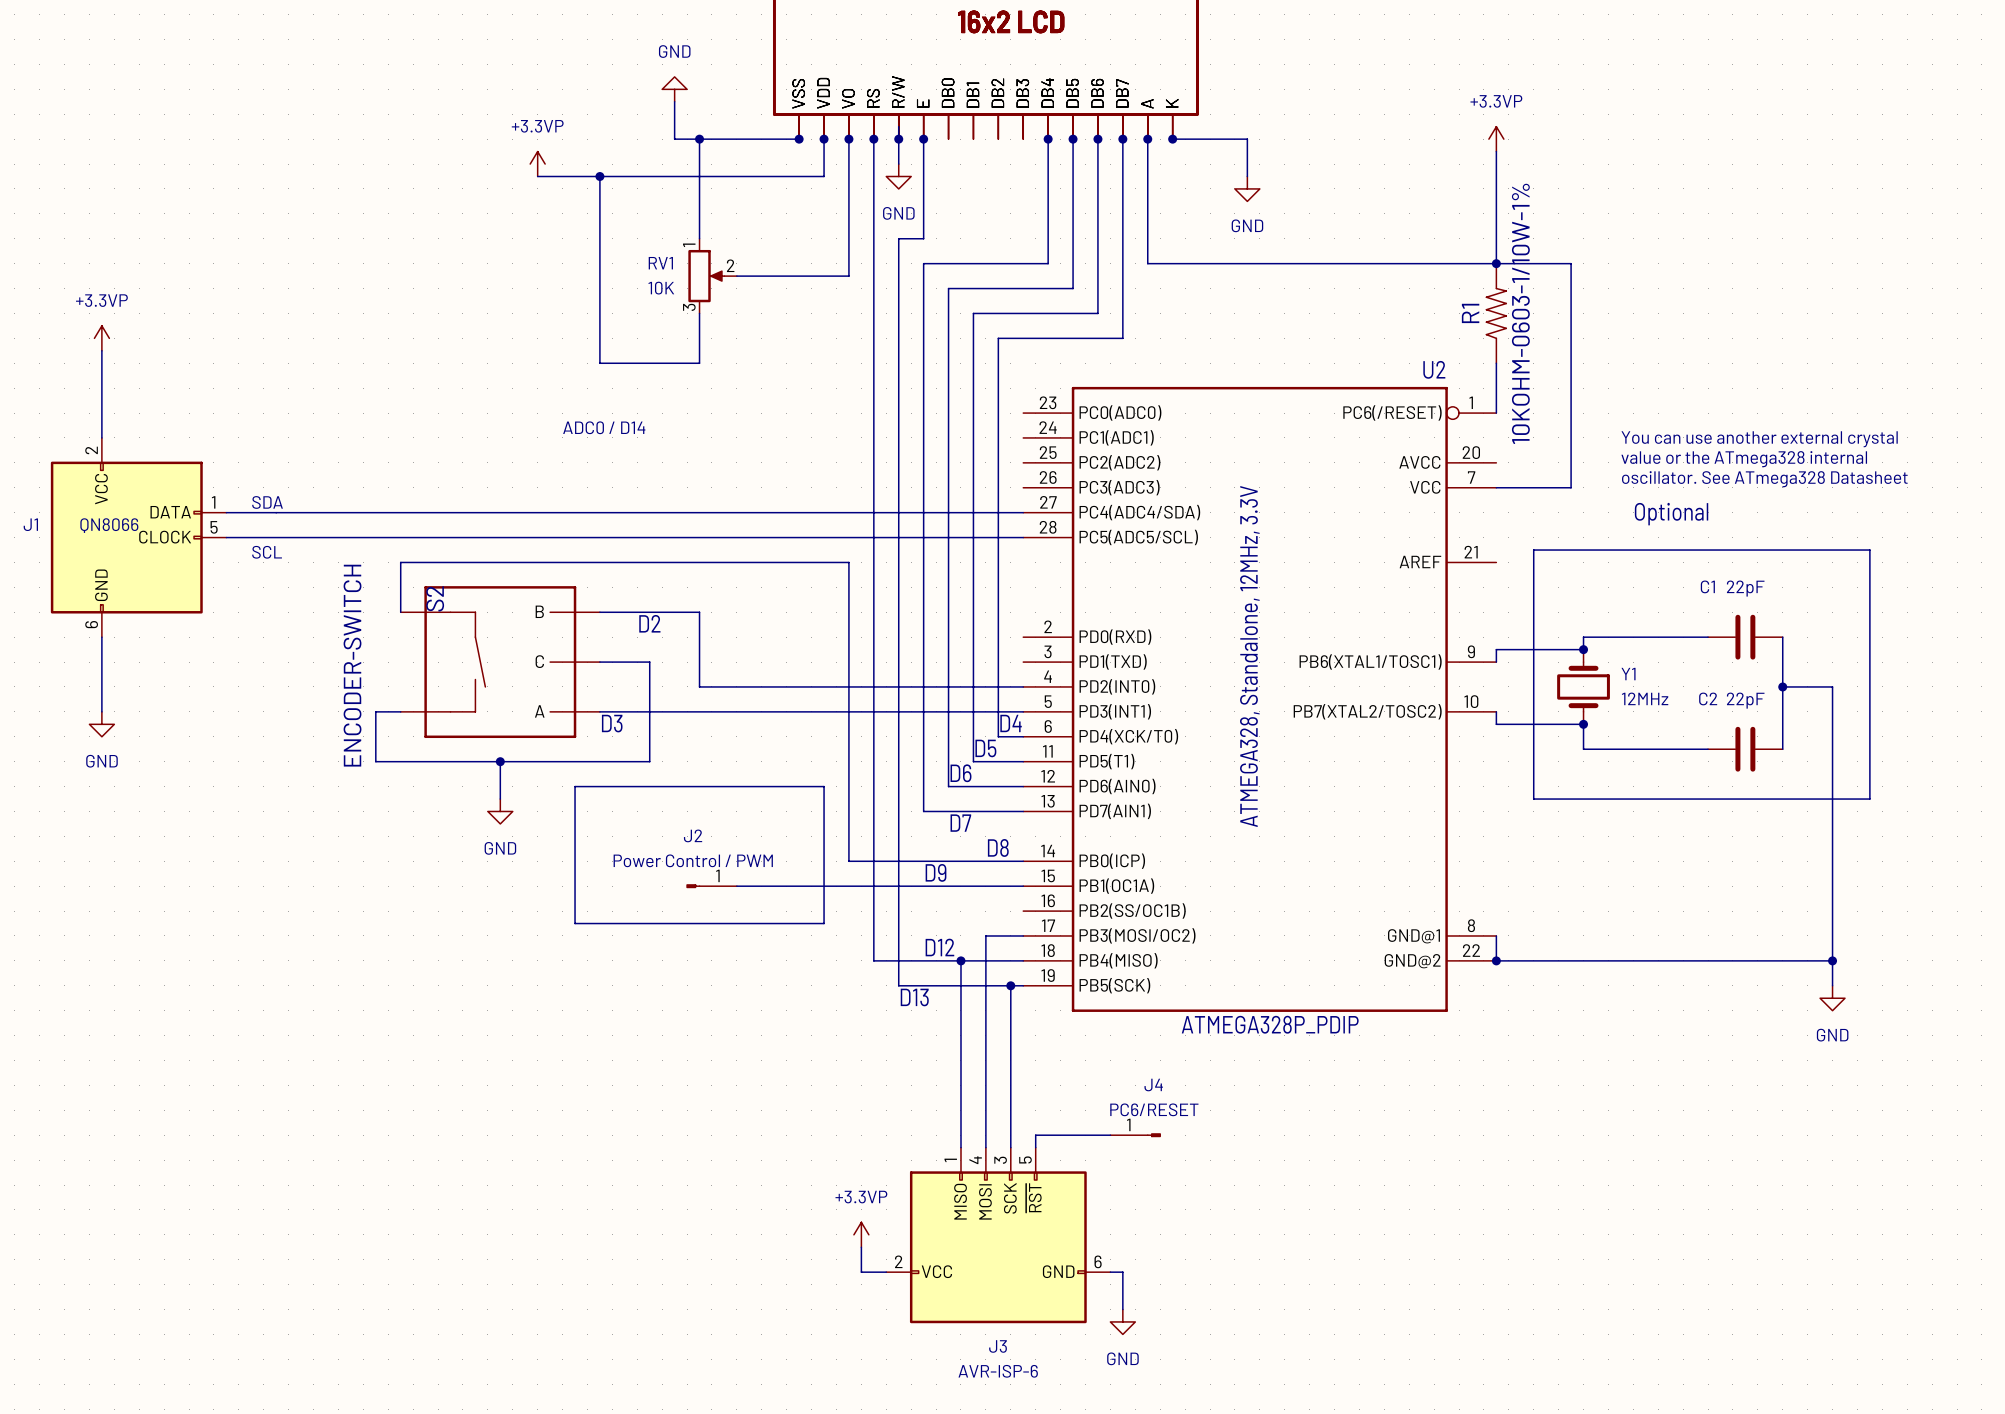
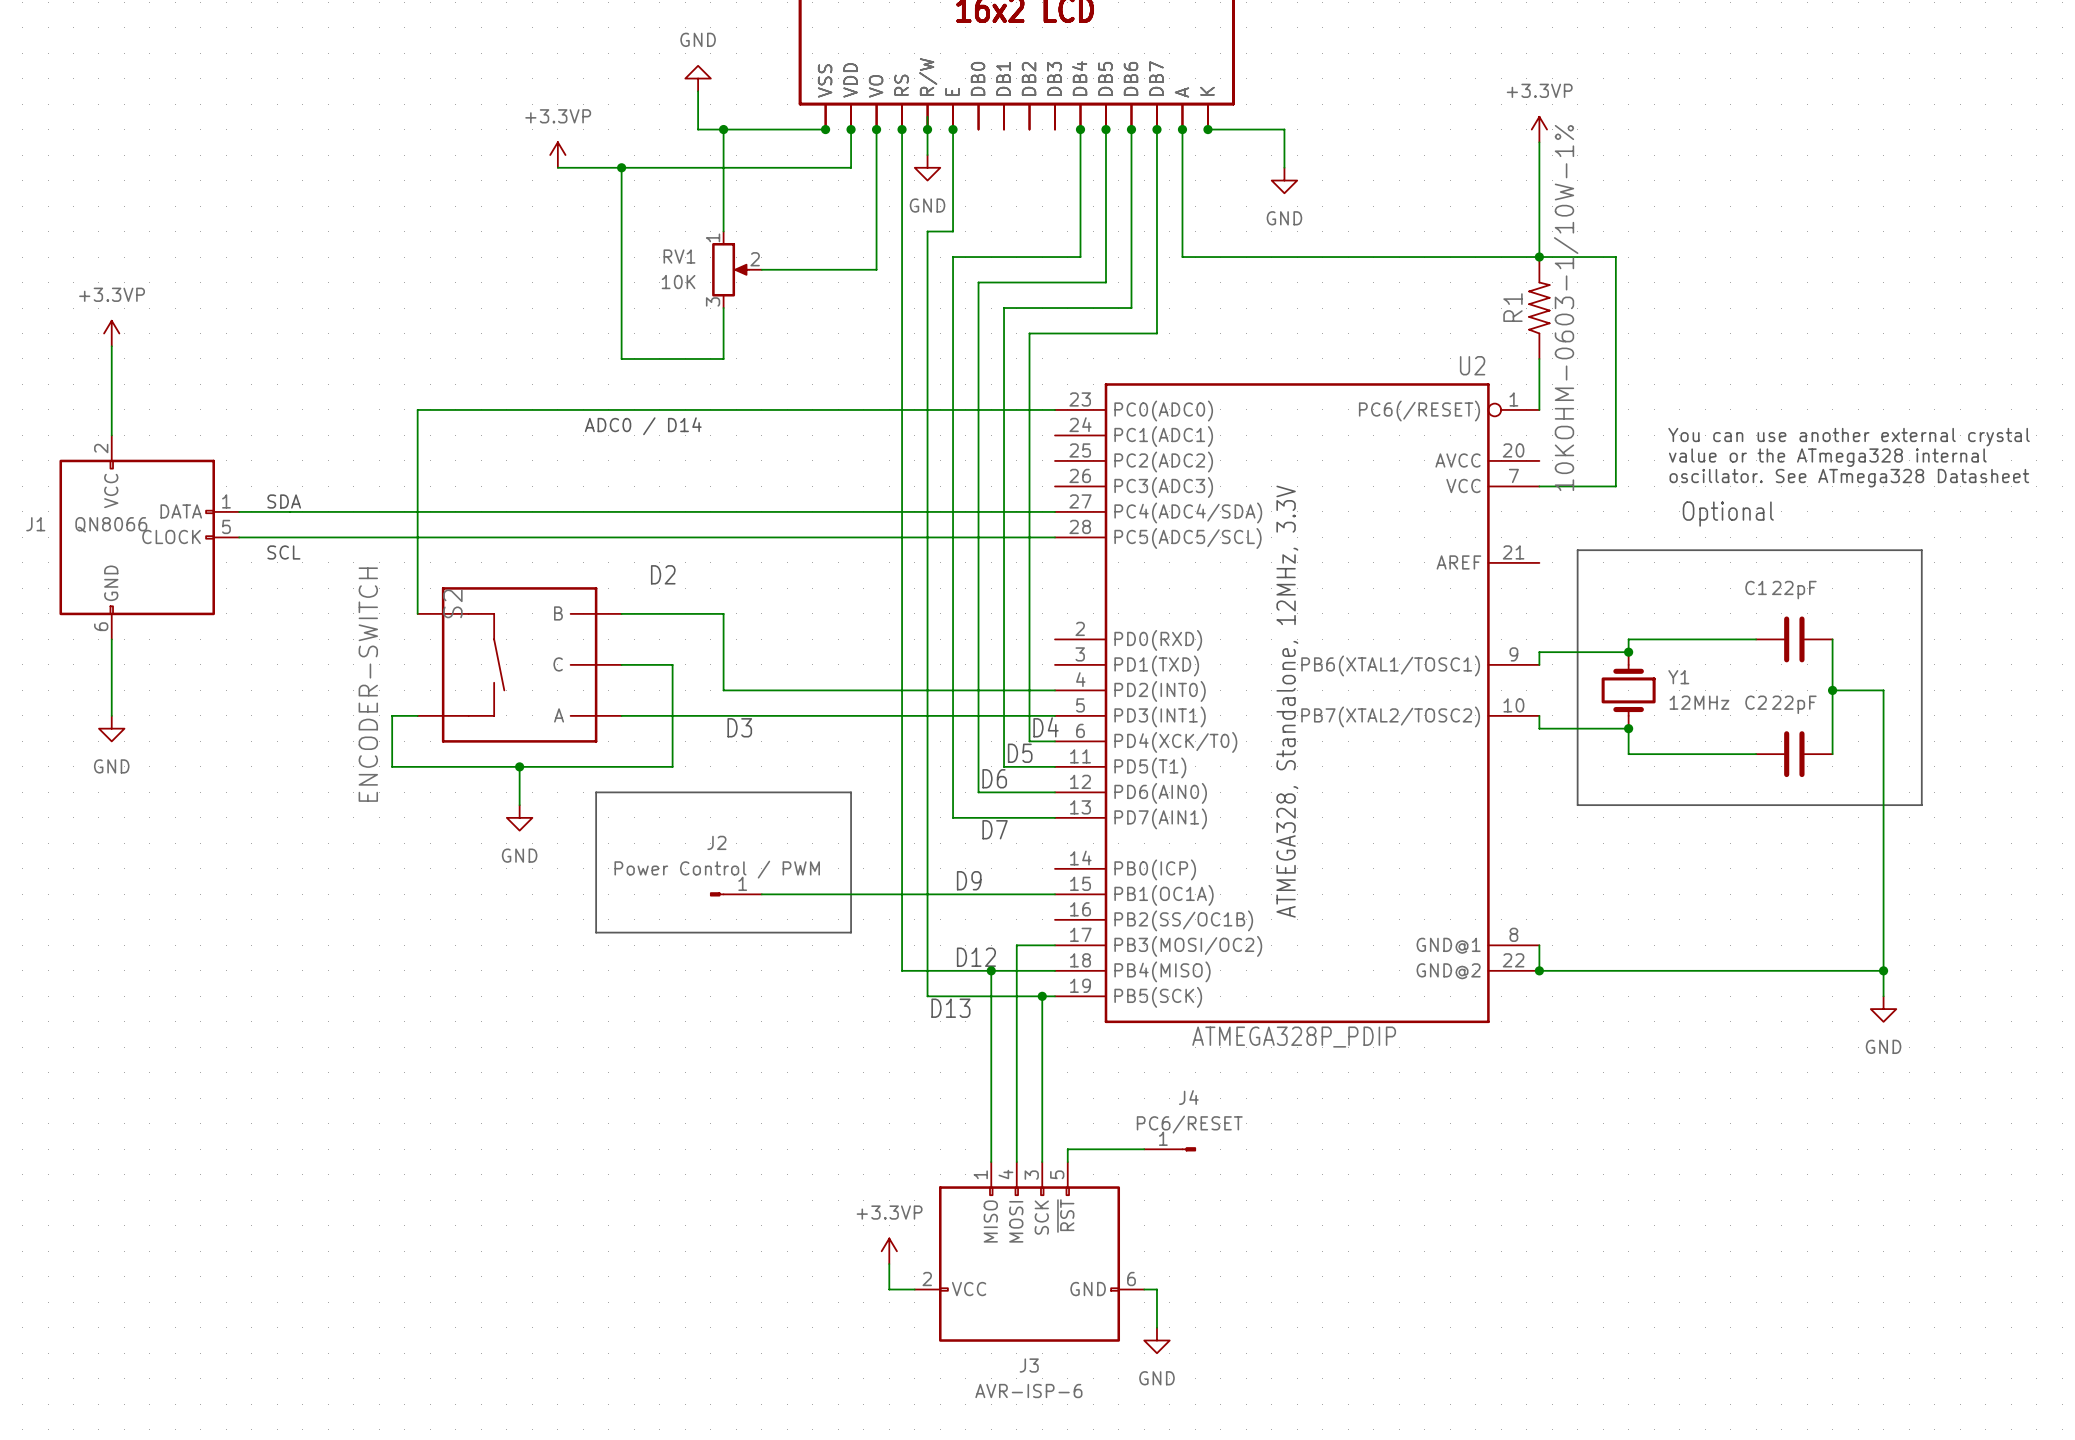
wire: (400, 562) (848, 562) (848, 861) (1023, 861) -> (417, 562) (417, 409) (1055, 409)
text position: D2 (649, 623) -> D2 (663, 574)
text position: D3 (612, 723) -> D3 (739, 727)
text: D8 (998, 847) -> none

